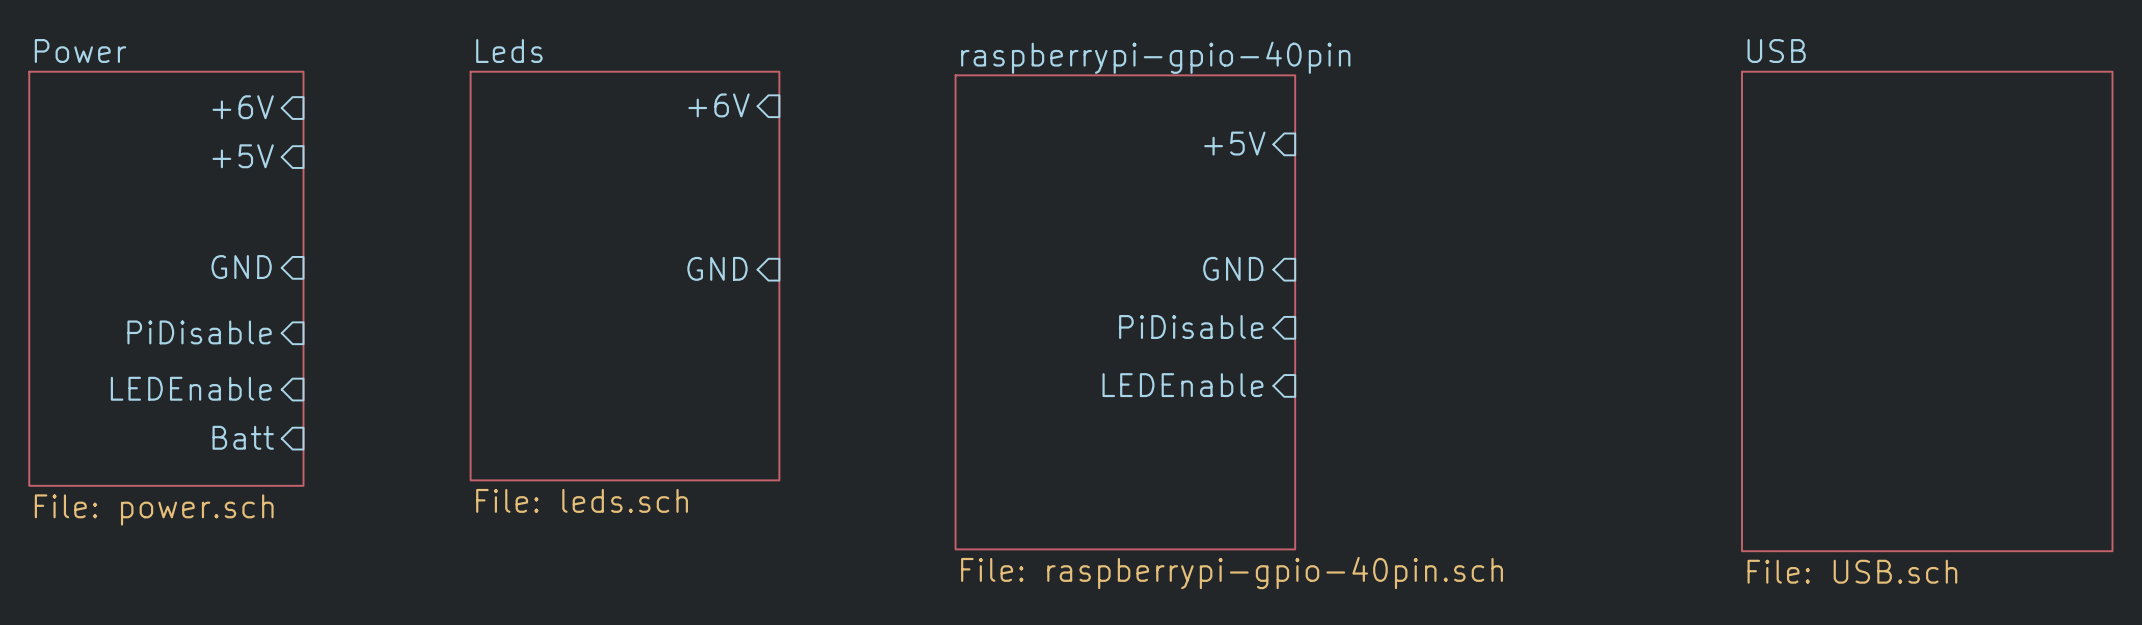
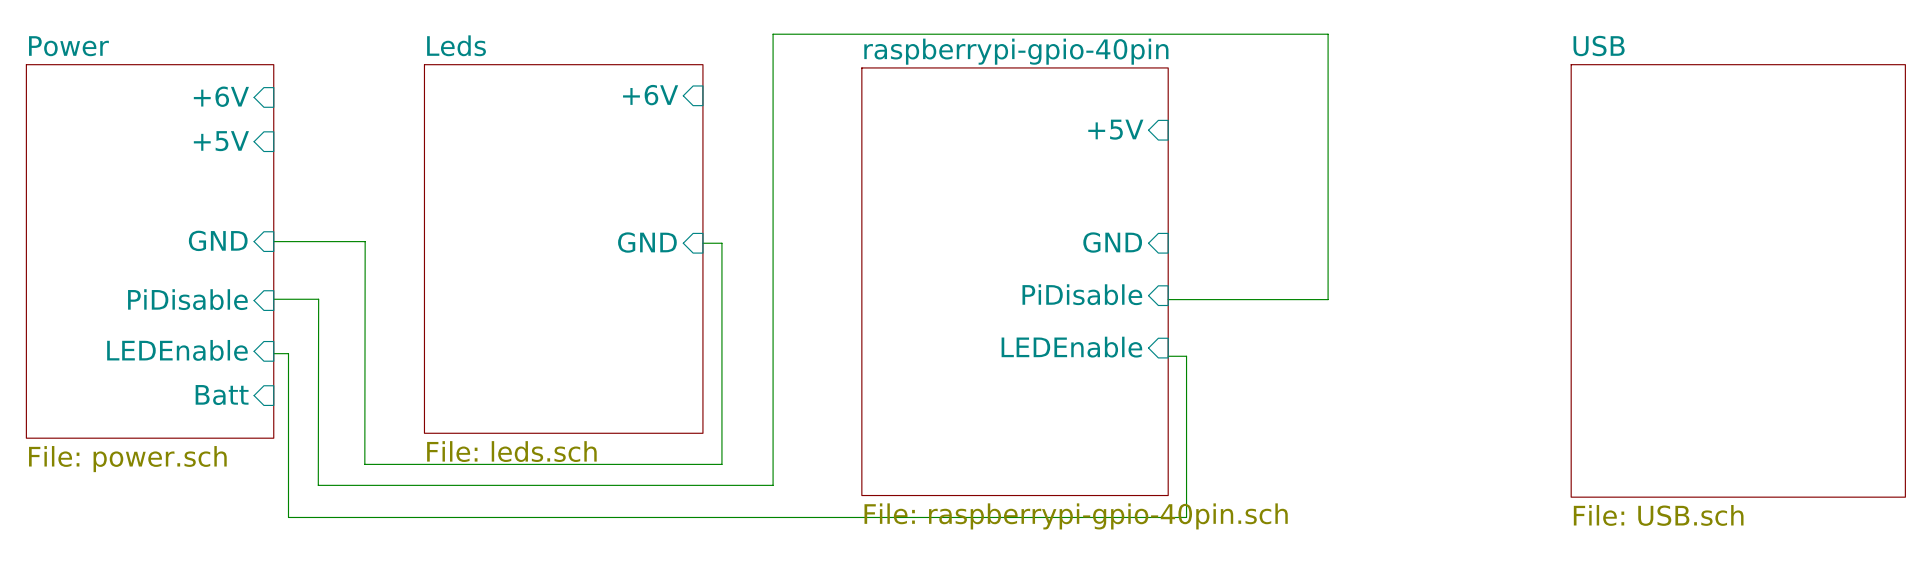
wire: none -> (273, 241) (365, 241) (364, 464) (721, 464) (721, 243) (702, 243)
wire: none -> (273, 299) (318, 299) (318, 485) (773, 485) (773, 34) (1328, 34) (1328, 299) (1168, 299)
wire: none -> (273, 353) (288, 353) (288, 517) (1186, 517) (1186, 356) (1168, 356)

